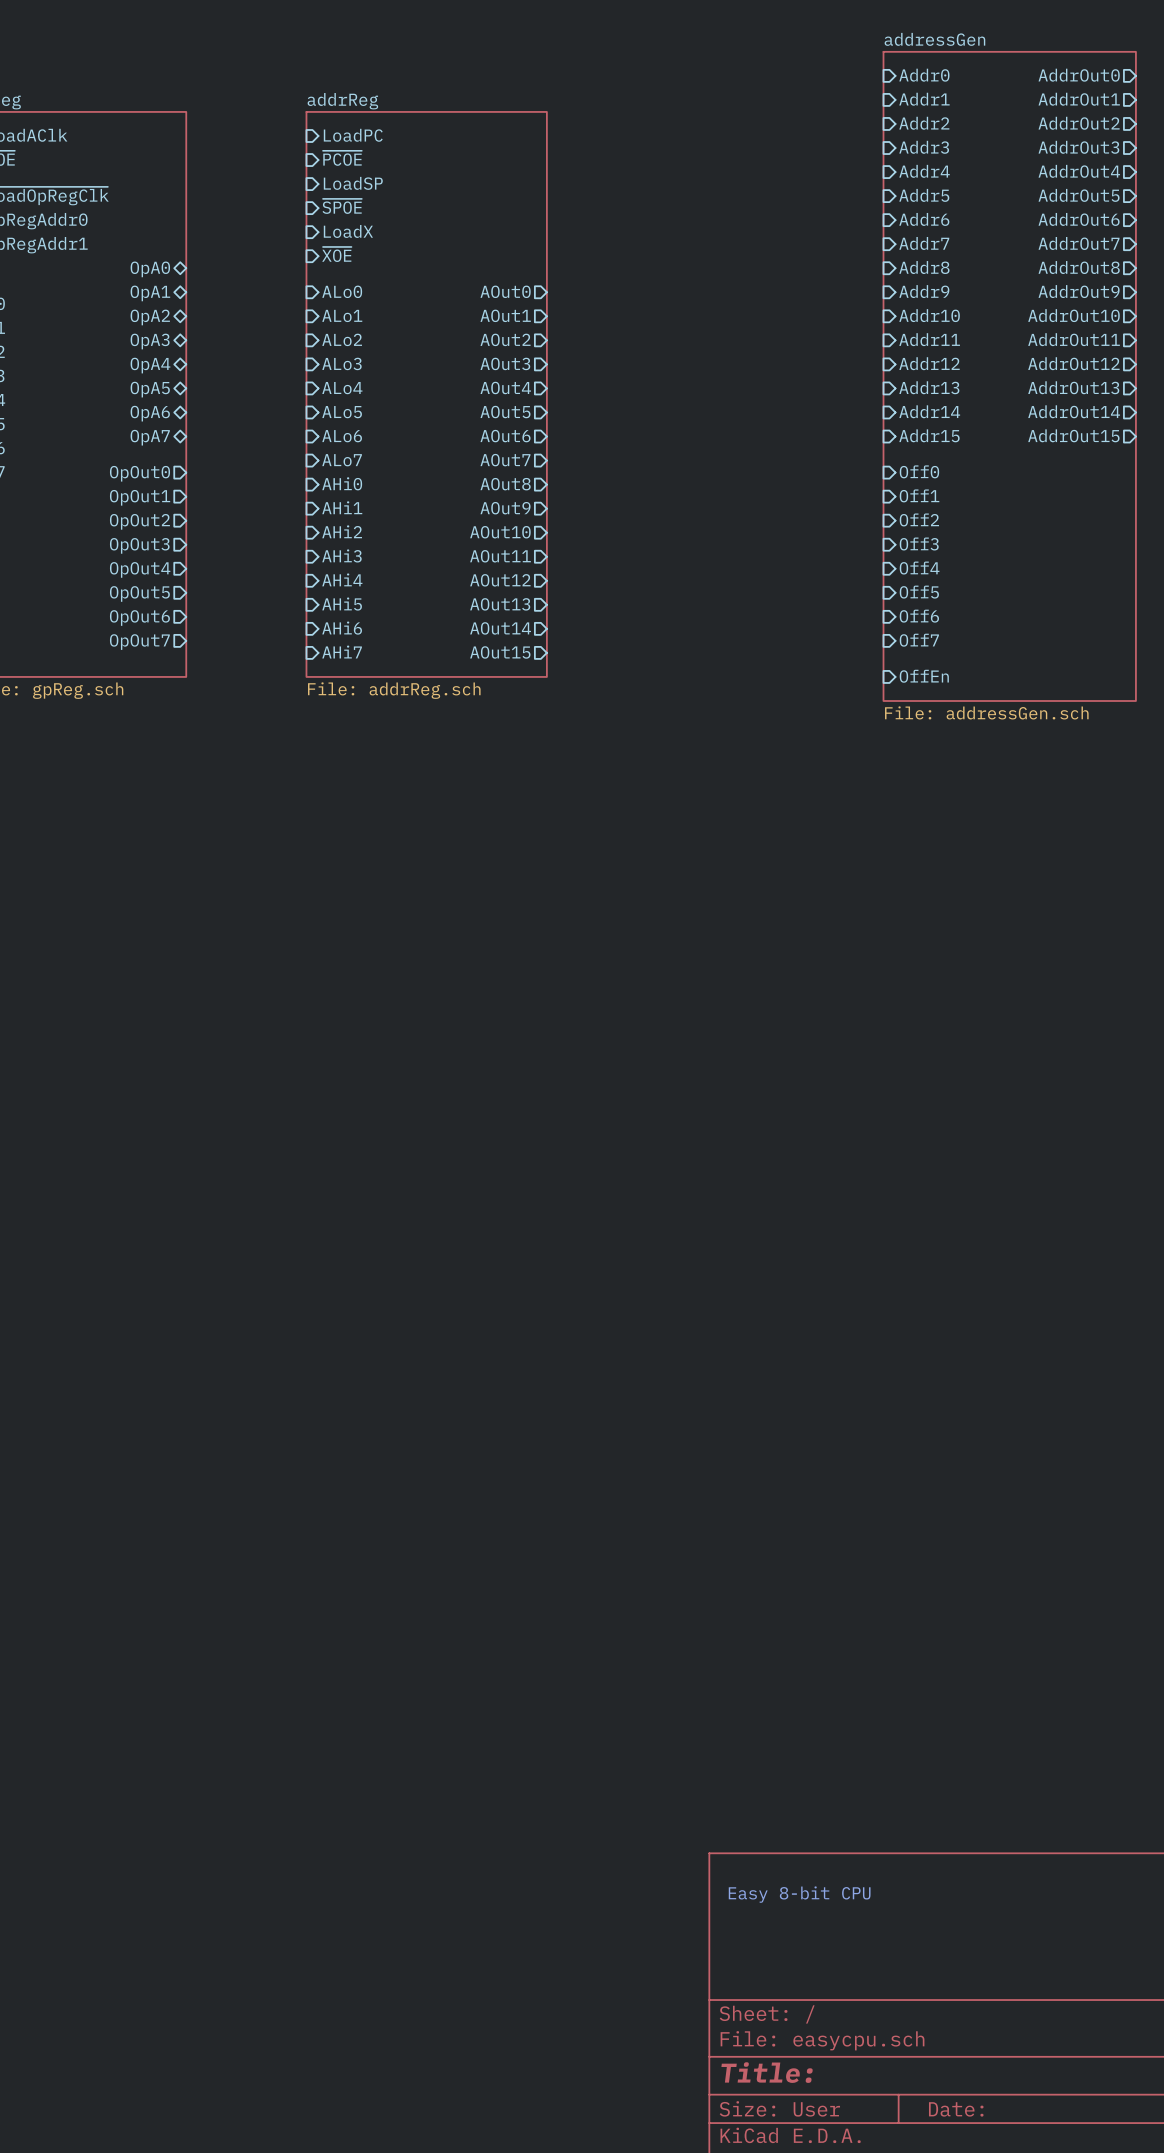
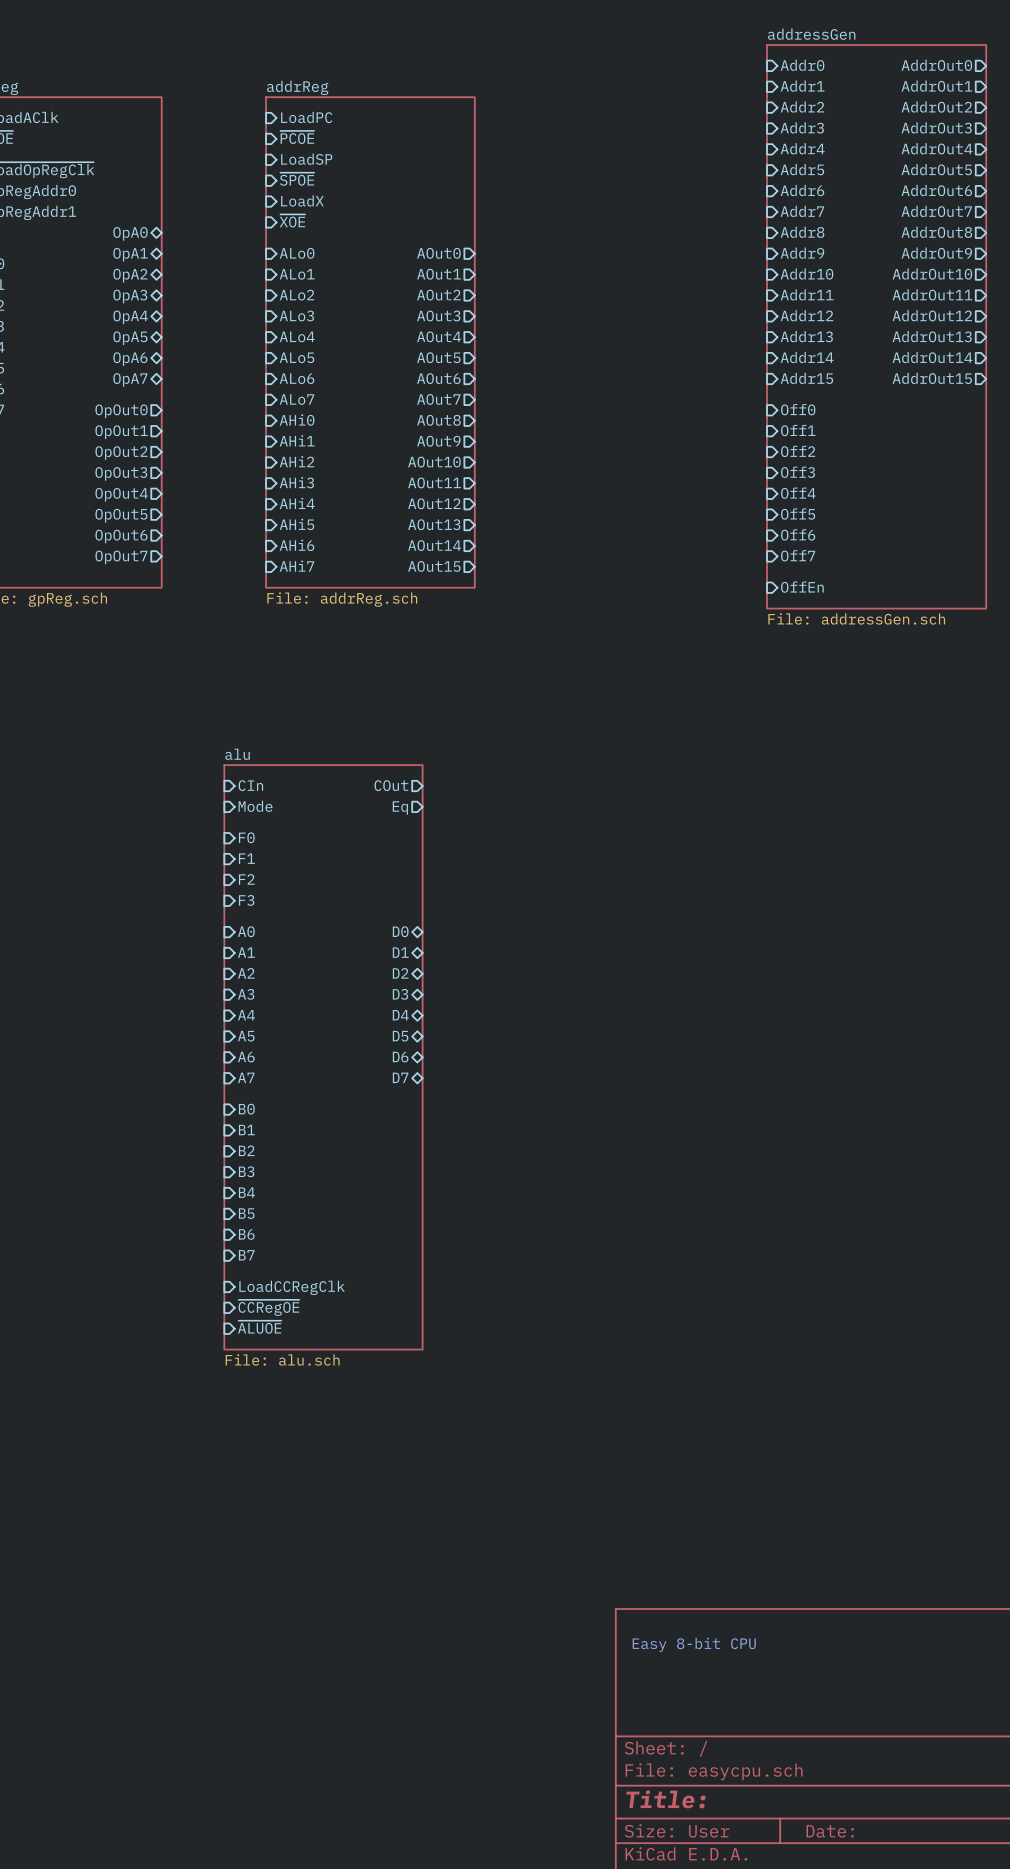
sheet pin: none -> CIn (250, 785)
sheet pin: none -> COut (391, 785)
sheet pin: none -> Mode (255, 806)
sheet pin: none -> Eq (400, 807)
sheet pin: none -> F0 (246, 837)
sheet pin: none -> F1 (246, 858)
sheet pin: none -> F2 (246, 879)
sheet pin: none -> F3 (246, 900)
sheet pin: none -> A0 (246, 931)
sheet pin: none -> D0 (400, 931)
sheet pin: none -> A1 (246, 952)
sheet pin: none -> D1 (400, 952)
sheet pin: none -> A2 (246, 973)
sheet pin: none -> D2 (400, 973)
sheet pin: none -> A3 (246, 994)
sheet pin: none -> D3 (400, 994)
sheet pin: none -> A4 (246, 1015)
sheet pin: none -> D4 (400, 1015)
sheet pin: none -> A5 (246, 1036)
sheet pin: none -> D5 (400, 1036)
sheet pin: none -> A6 (246, 1057)
sheet alu: none -> File: alu.sch (323, 1057)
sheet pin: none -> D6 (400, 1057)
sheet pin: none -> A7 (246, 1077)
sheet pin: none -> D7 (400, 1077)
sheet pin: none -> B0 (246, 1109)
sheet pin: none -> B1 (246, 1130)
sheet pin: none -> B2 (246, 1150)
sheet pin: none -> B3 (246, 1171)
sheet pin: none -> B4 (246, 1192)
sheet pin: none -> B5 (246, 1213)
sheet pin: none -> B6 (246, 1234)
sheet pin: none -> B7 (246, 1255)
sheet pin: none -> LoadCCRegClk (292, 1287)
sheet pin: none -> ~{CCRegOE} (268, 1307)
sheet pin: none -> ~{ALUOE} (259, 1327)

